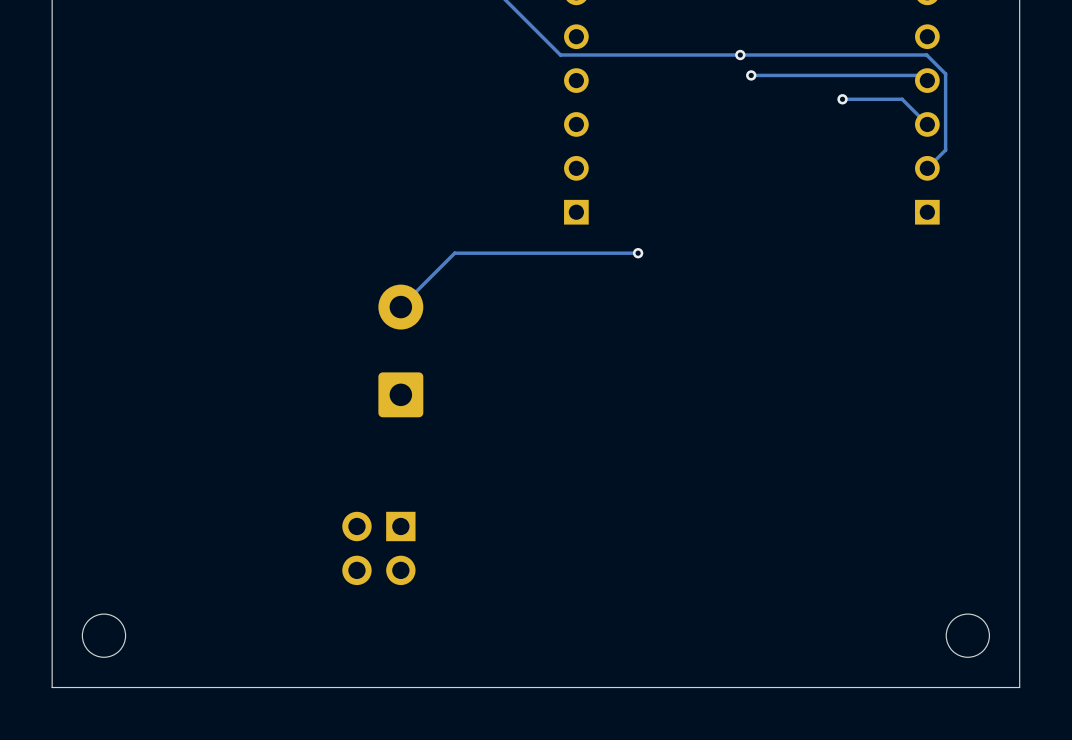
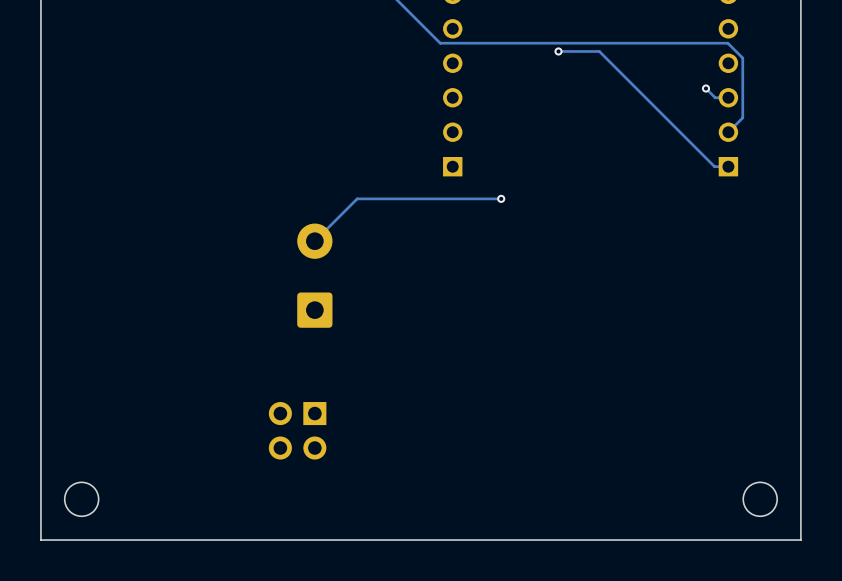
via: (740, 55) -> none
track: none -> (558, 51) (599, 51) (714, 166) (728, 166)
via: none -> (558, 51)
track: (751, 75) (922, 75) (927, 80) -> none
via: (751, 75) -> none
track: (842, 99) (902, 99) (927, 124) -> (705, 88) (715, 97) (728, 97)
via position: (842, 99) -> (705, 88)

